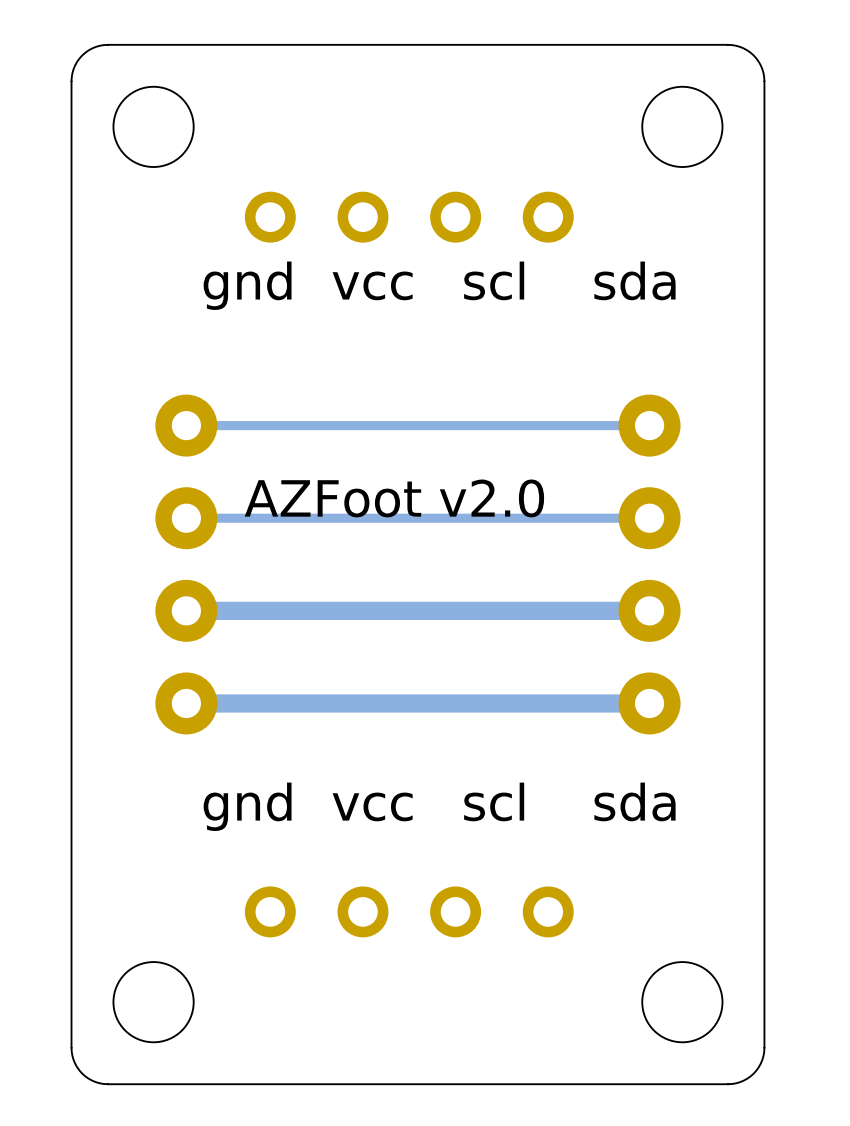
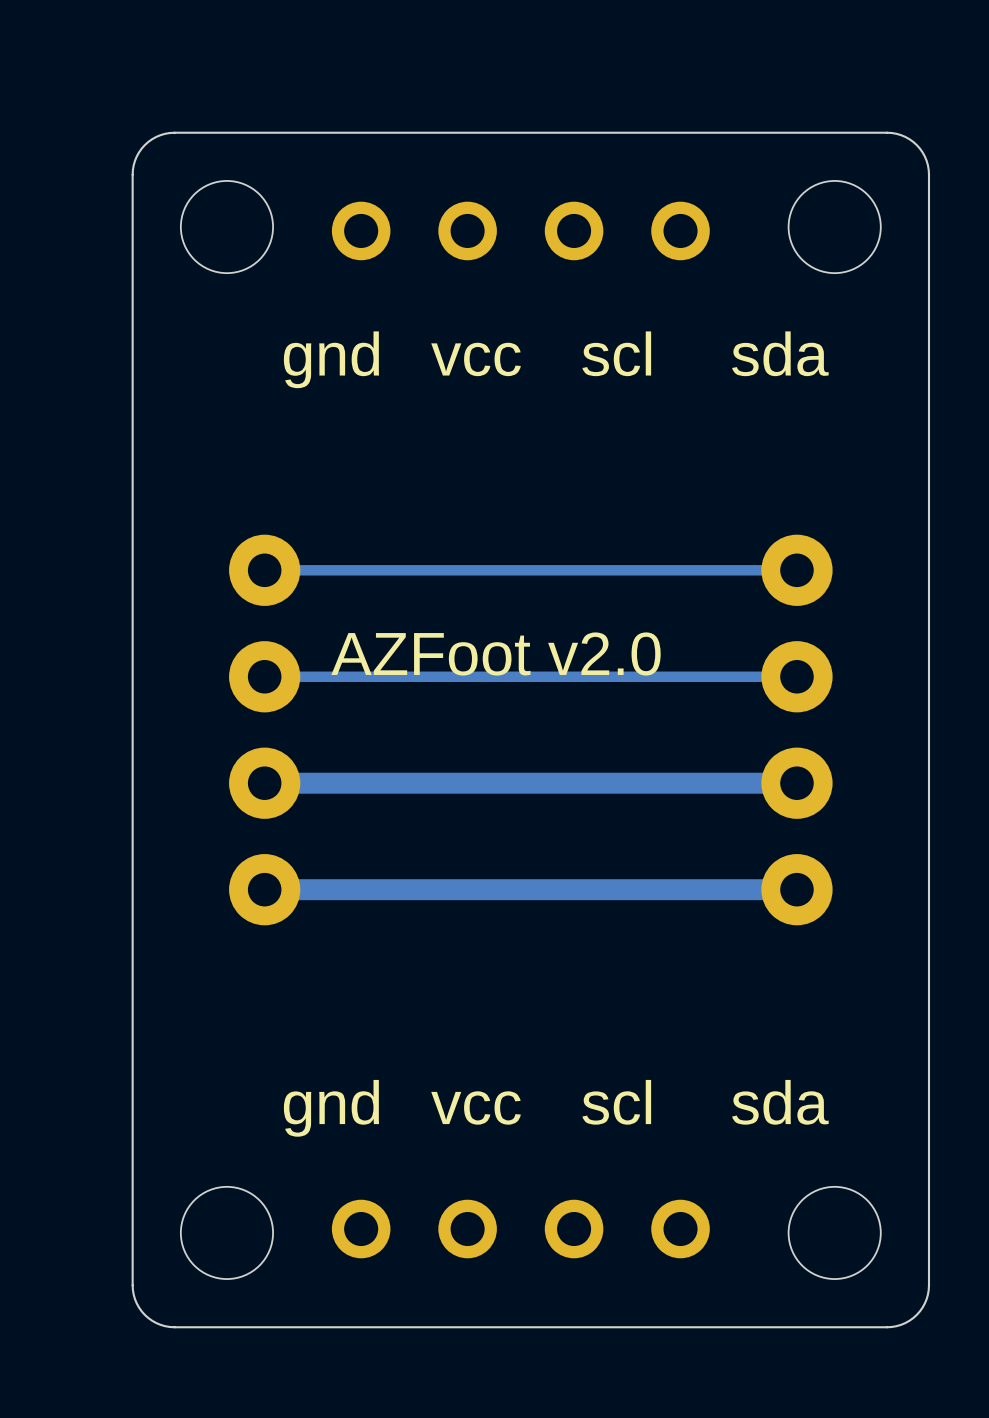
part position: (409, 217) -> (520, 230)
text position: scl (494, 280) -> scl (616, 353)
text position: sda (634, 280) -> sda (780, 353)
text position: gnd (247, 285) -> gnd (331, 359)
text position: vcc (372, 285) -> vcc (476, 359)
text position: scl (494, 801) -> scl (616, 1102)
text position: sda (634, 801) -> sda (780, 1102)
text position: gnd (247, 806) -> gnd (331, 1108)
text position: vcc (372, 806) -> vcc (476, 1107)
part position: (409, 911) -> (520, 1229)

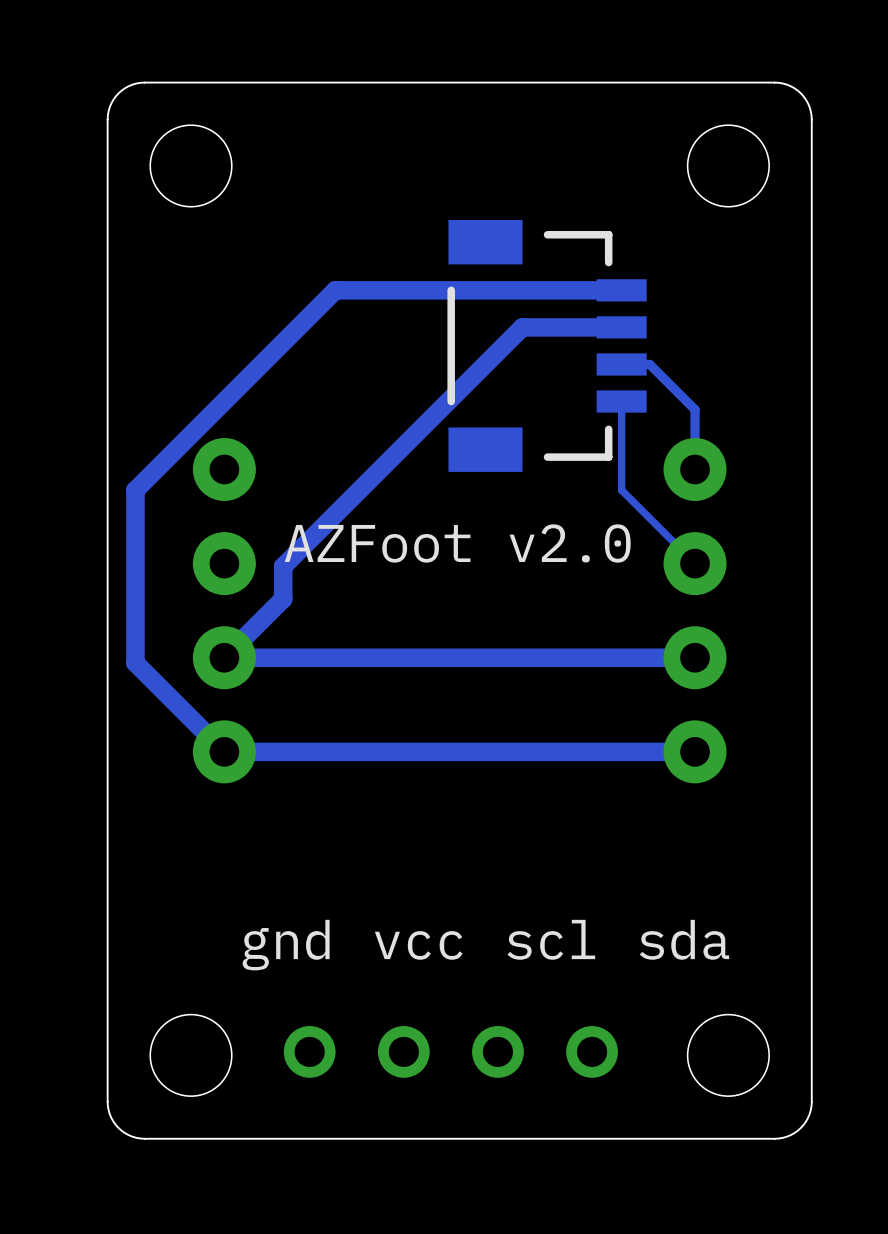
part: (520, 230) -> none
text: scl (616, 353) -> none
text: sda (780, 353) -> none
text: gnd (331, 359) -> none
text: vcc (476, 359) -> none
track: none -> (621, 290) (335, 290) (135, 490) (135, 662) (224, 751)
track: none -> (621, 327) (522, 327) (283, 566) (283, 598) (224, 657)
part: none -> (547, 345)
track: (796, 570) (264, 570) -> (695, 469) (695, 409) (649, 364) (621, 364)
track: (796, 676) (264, 676) -> (695, 563) (621, 490) (621, 401)

